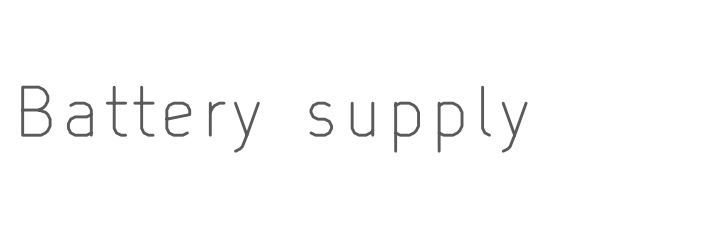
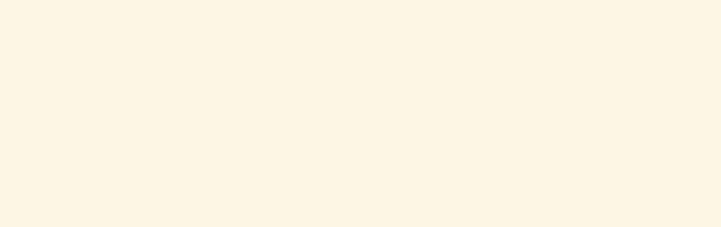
text: Battery supply (274, 119) -> none

